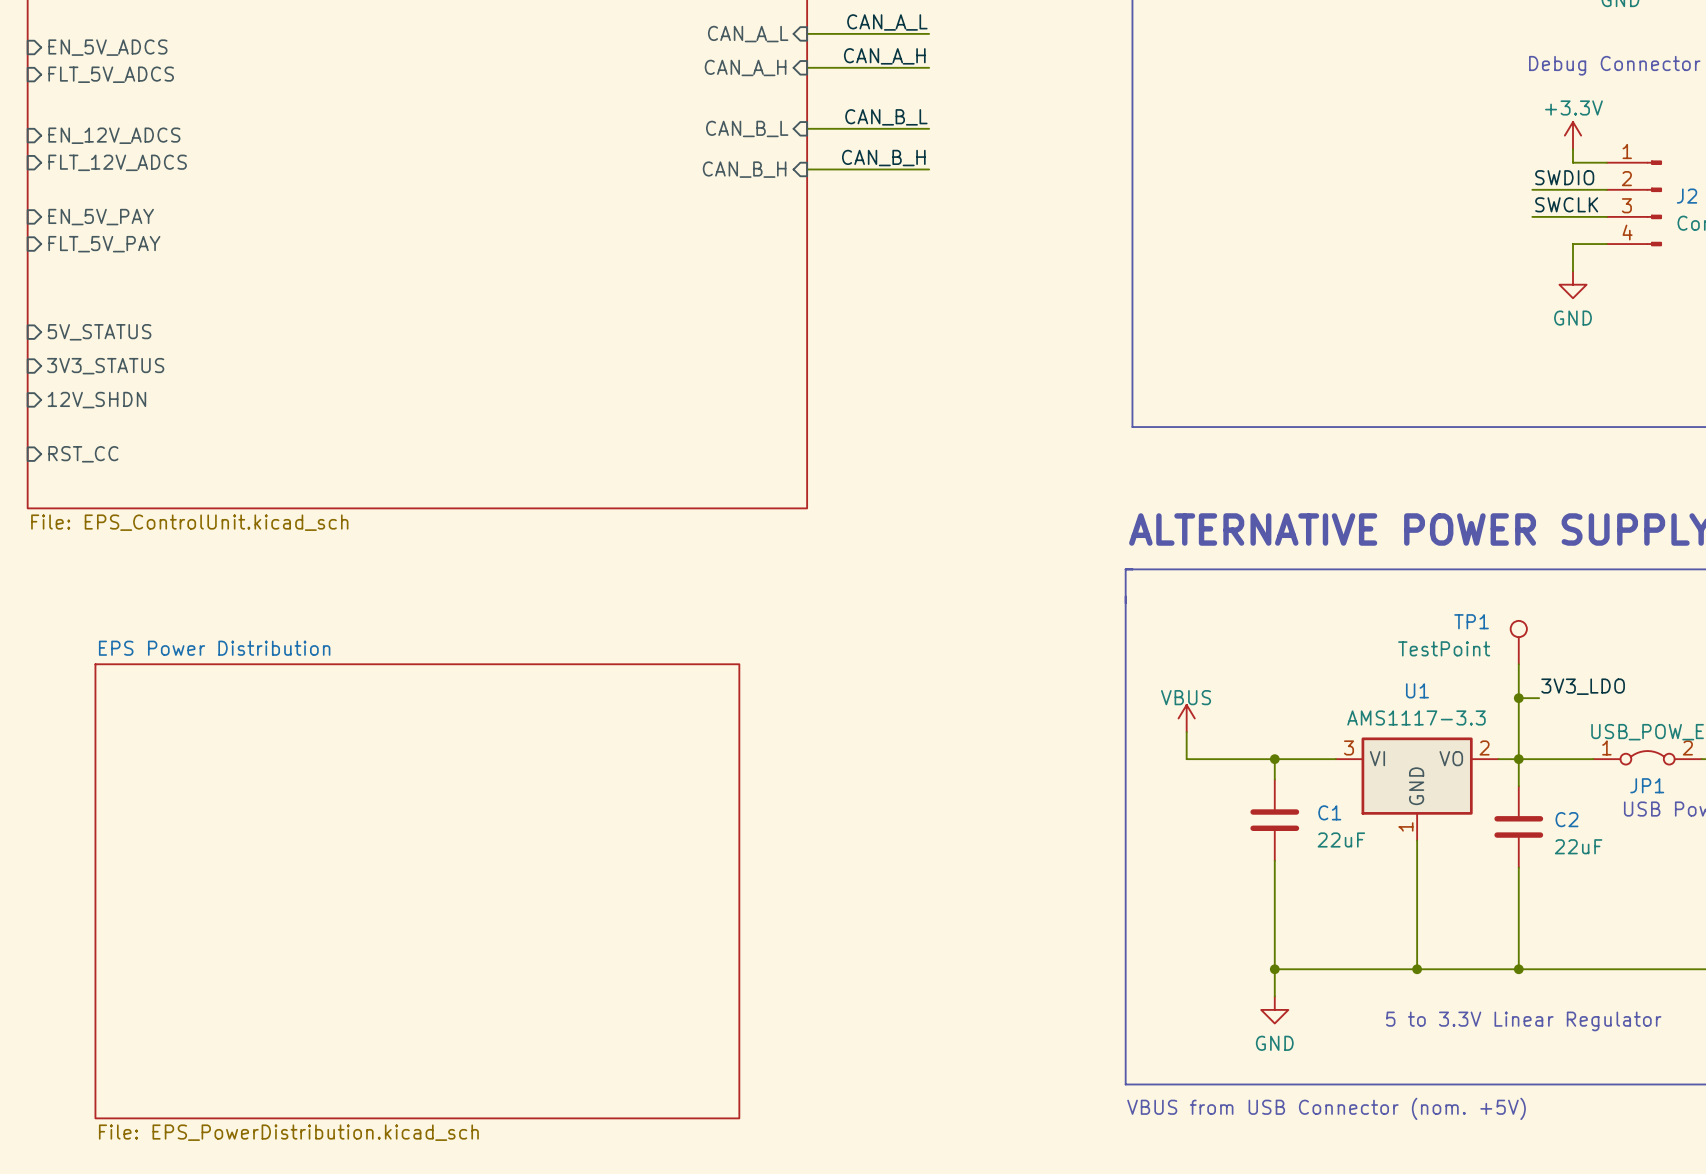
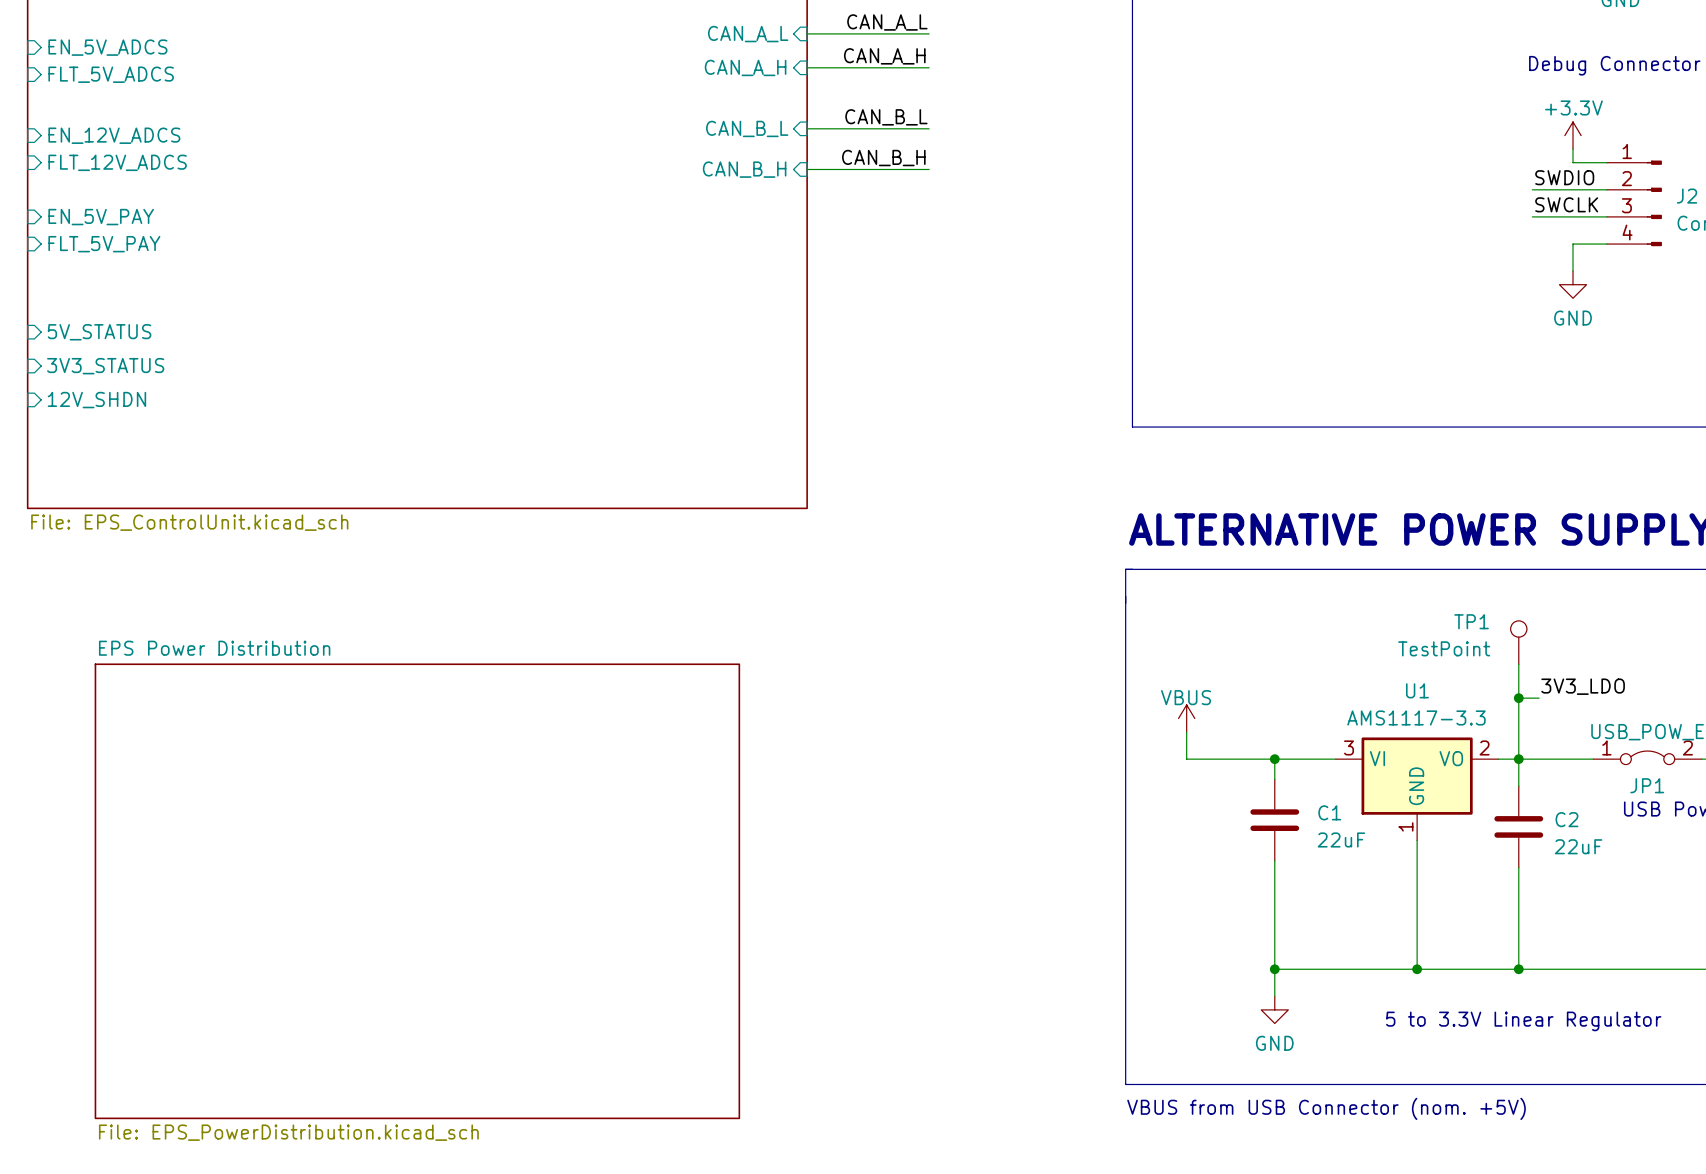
sheet pin: RST_CC (83, 454) -> none

